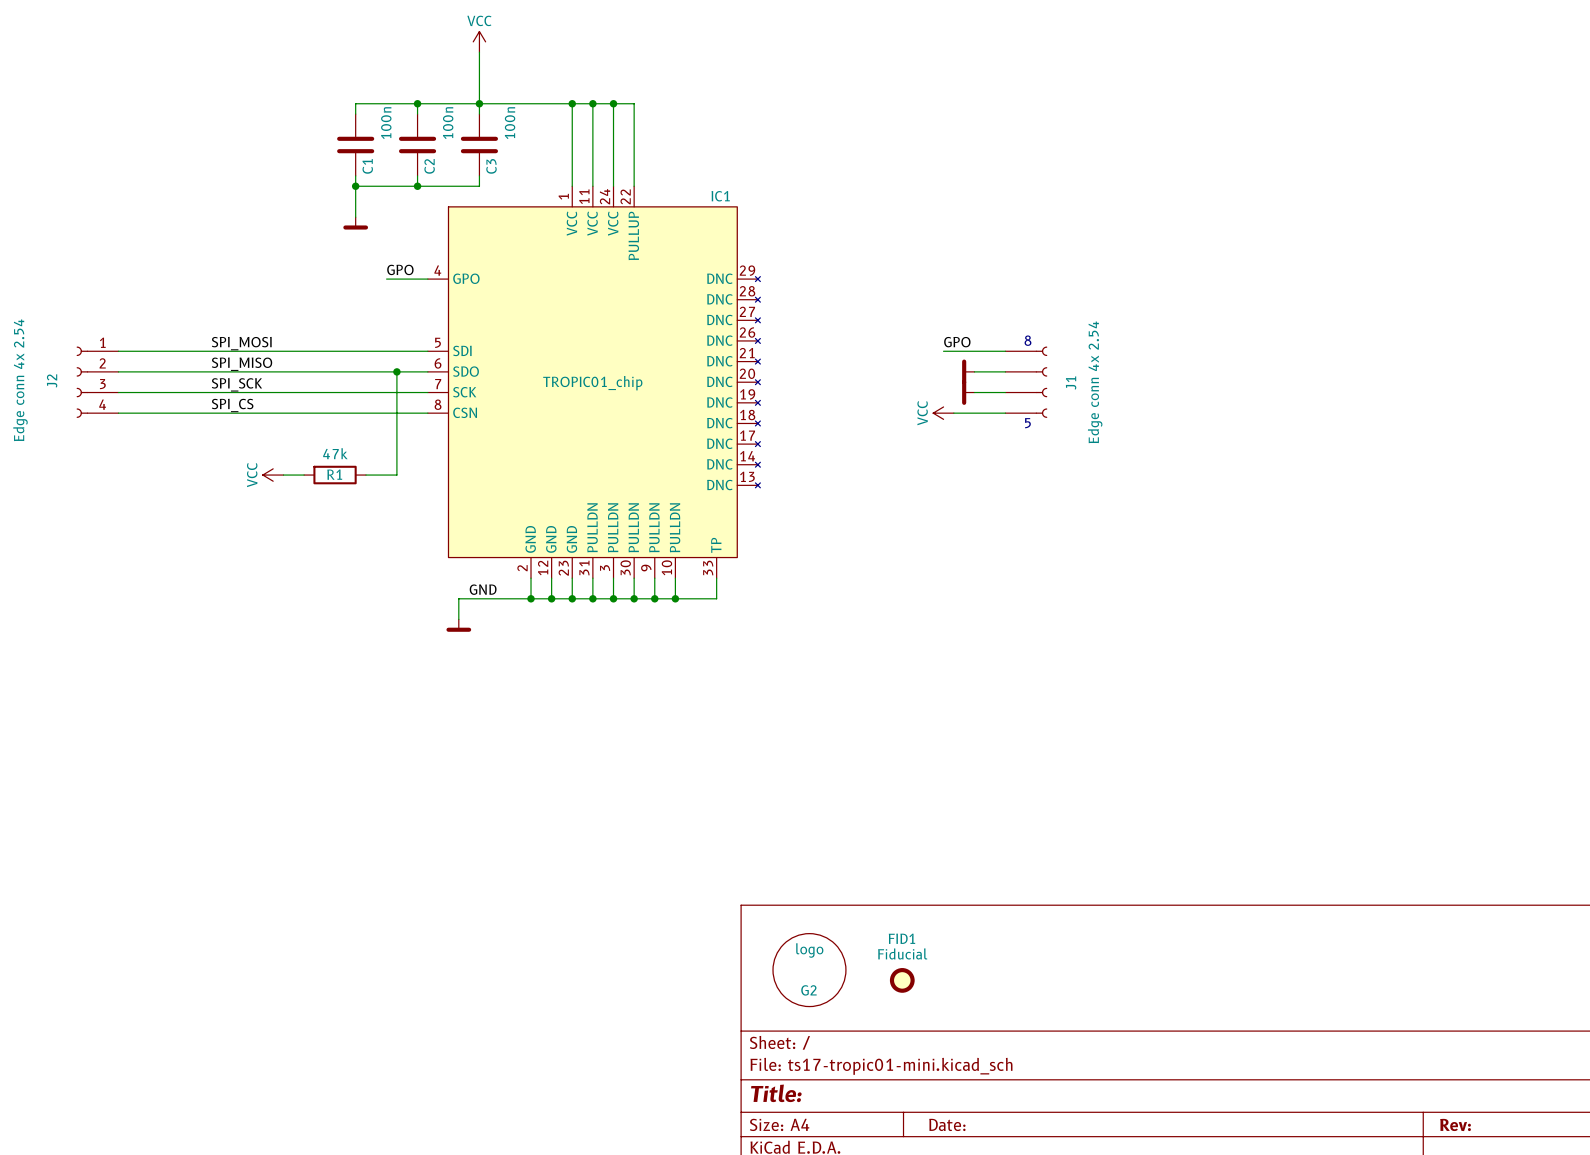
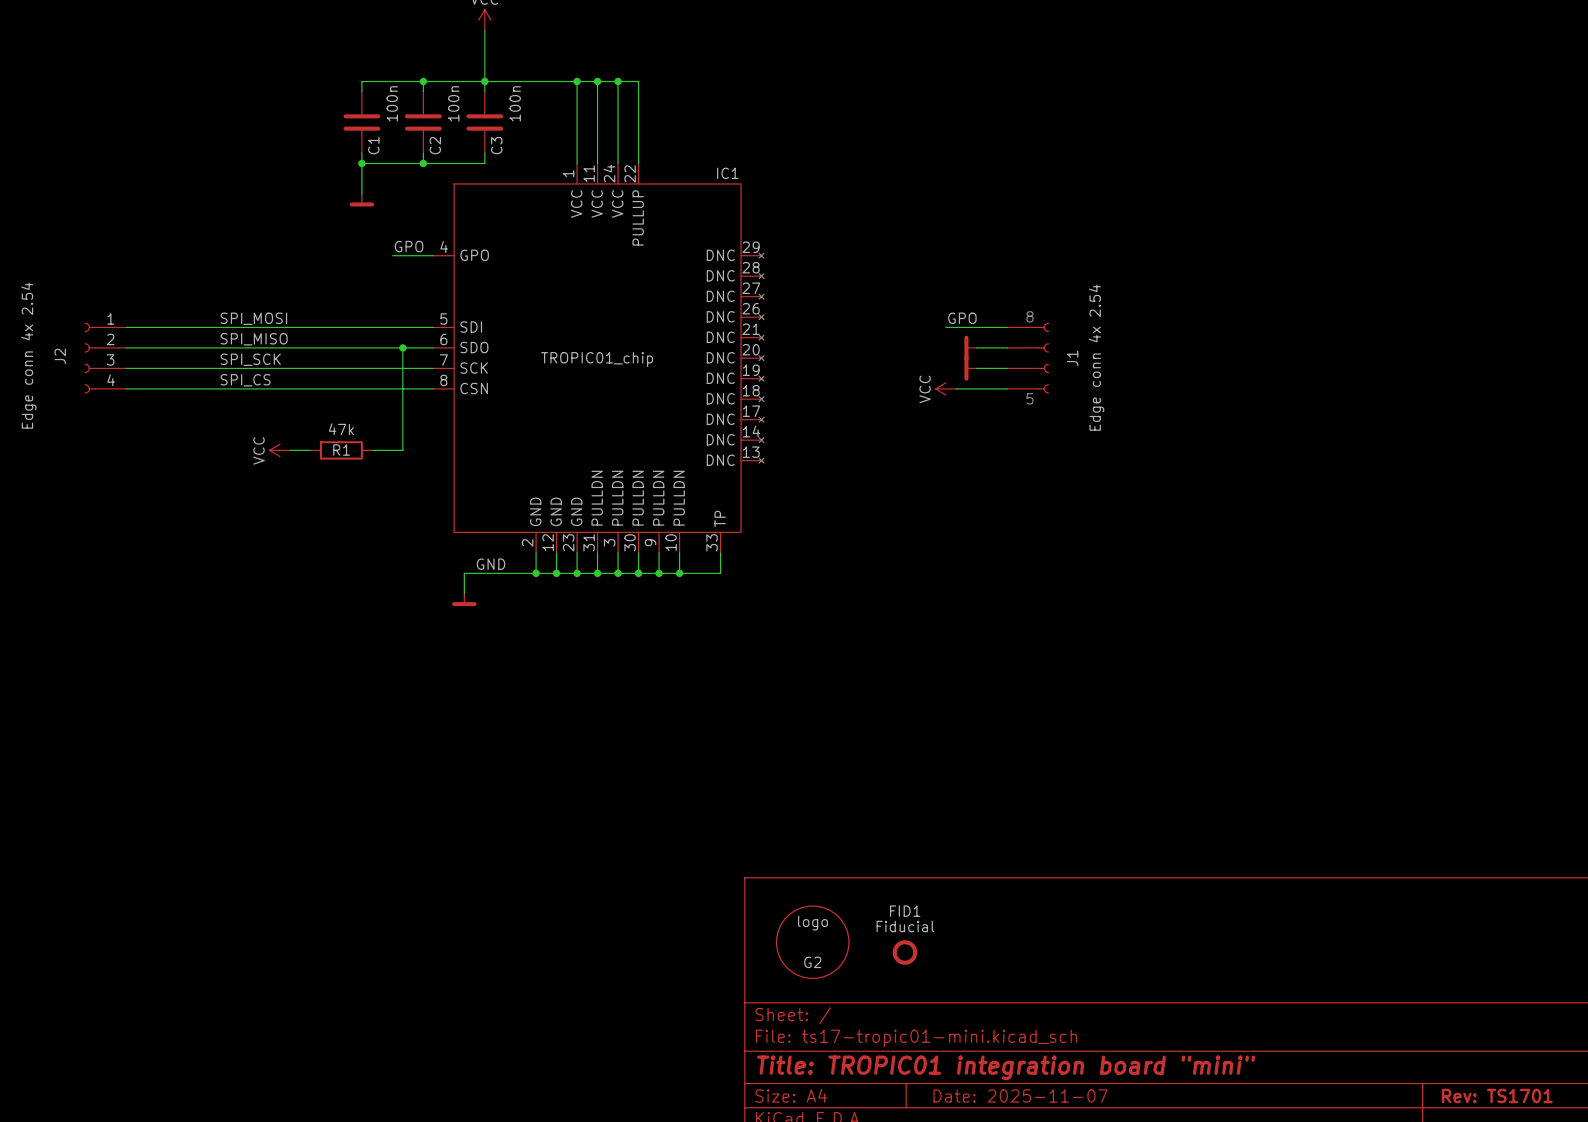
title block: Title: (776, 1093) -> Title: TROPIC01 integration board "mini" (1005, 1067)
title block: Date: (947, 1124) -> Date: 2025-11-07 (1020, 1095)
title block: Rev: (1455, 1124) -> Rev: TS1701 (1497, 1095)

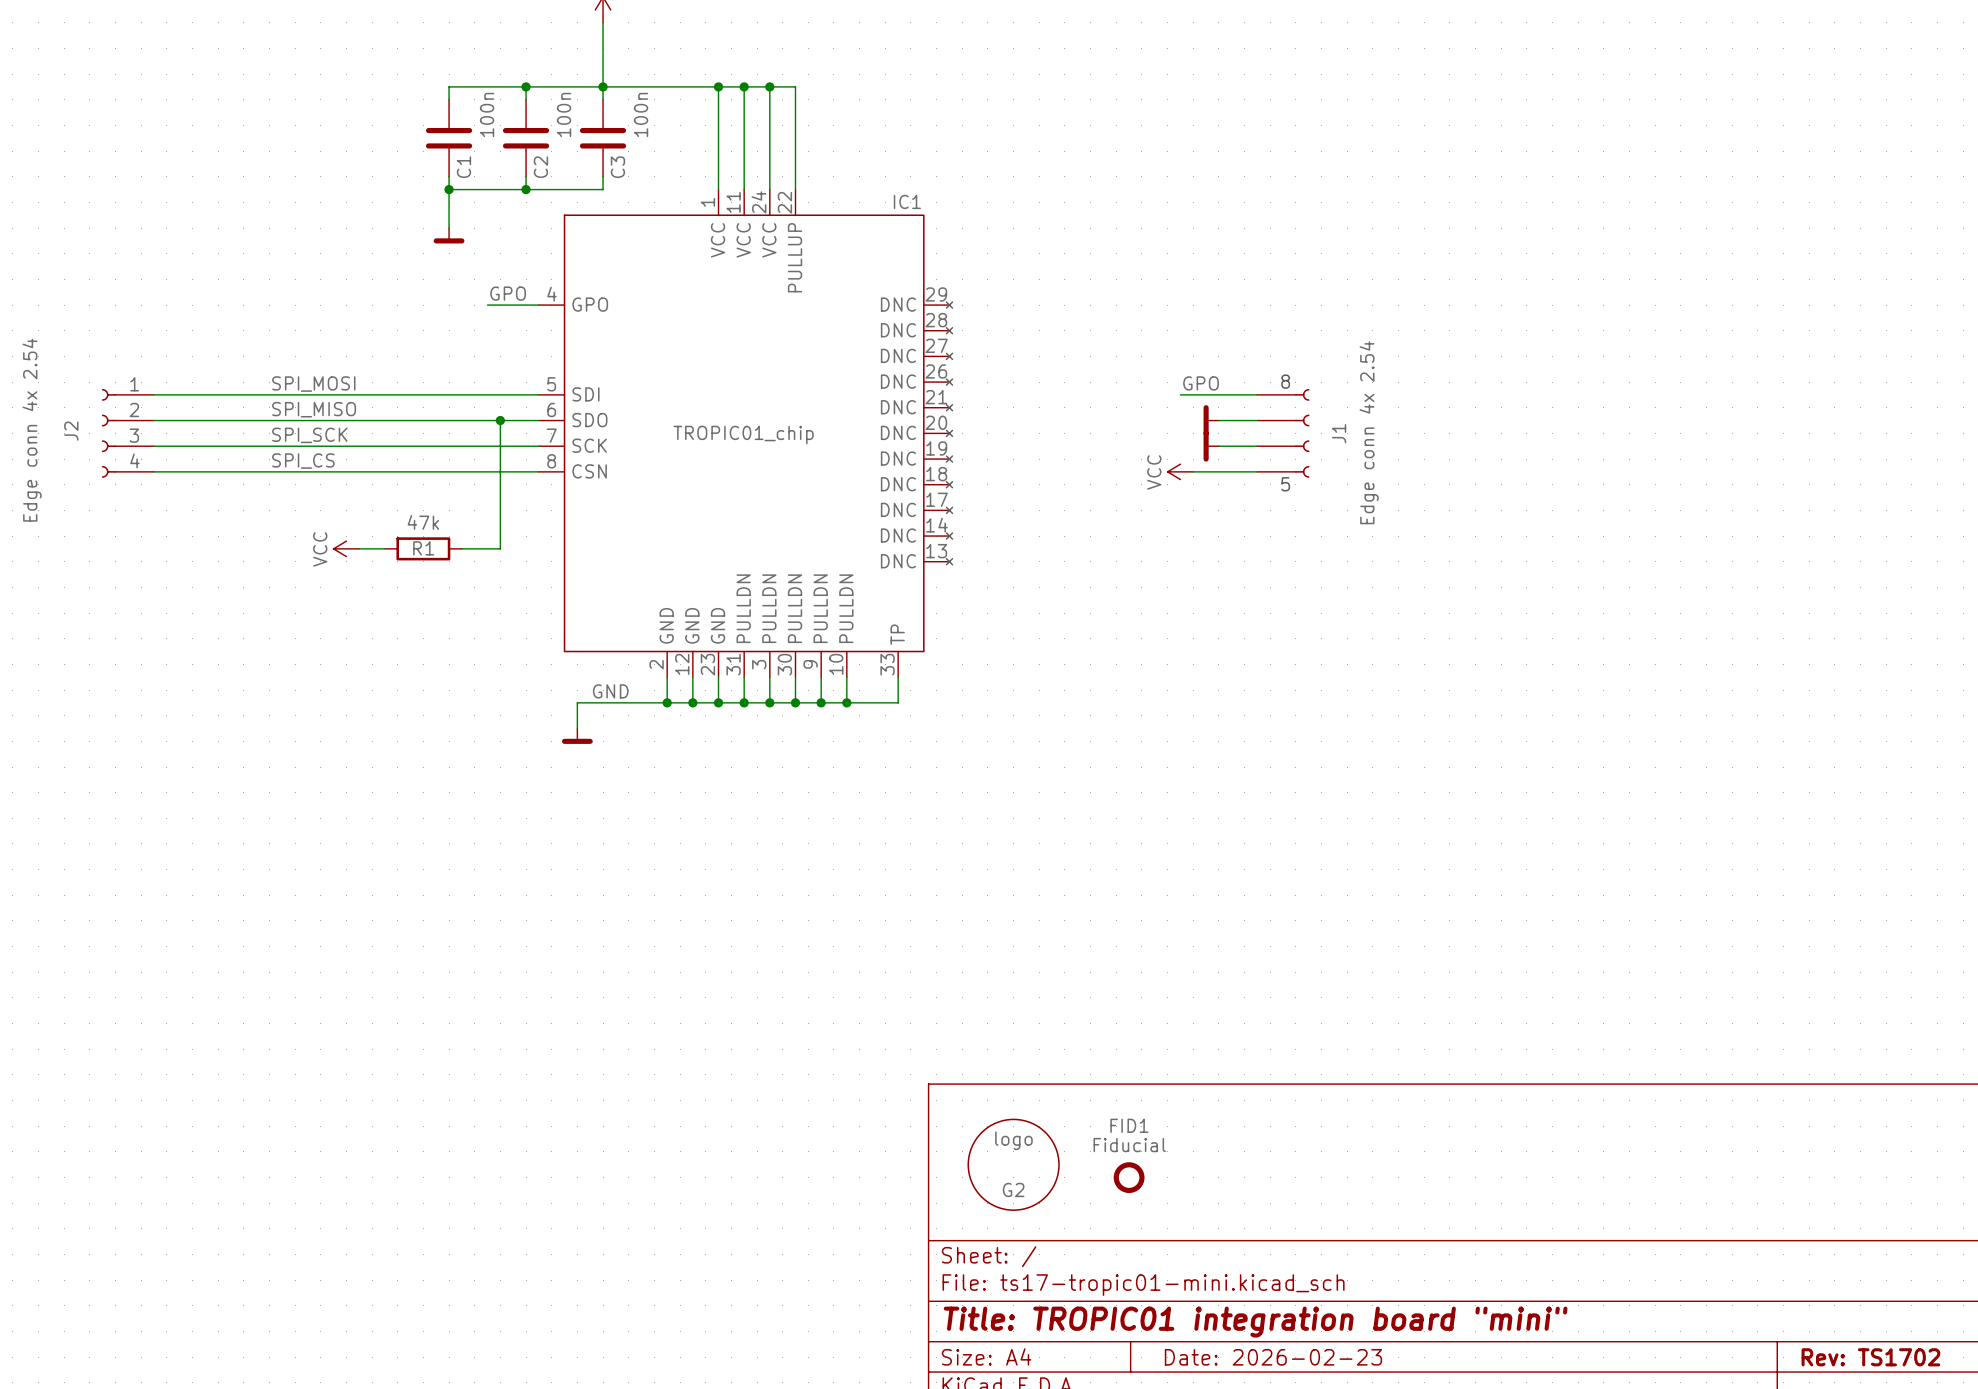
title block: Date: 2025-11-07 (1020, 1095) -> Date: 2026-02-23 (1273, 1357)
title block: Rev: TS1701 (1497, 1095) -> Rev: TS1702 (1870, 1357)

